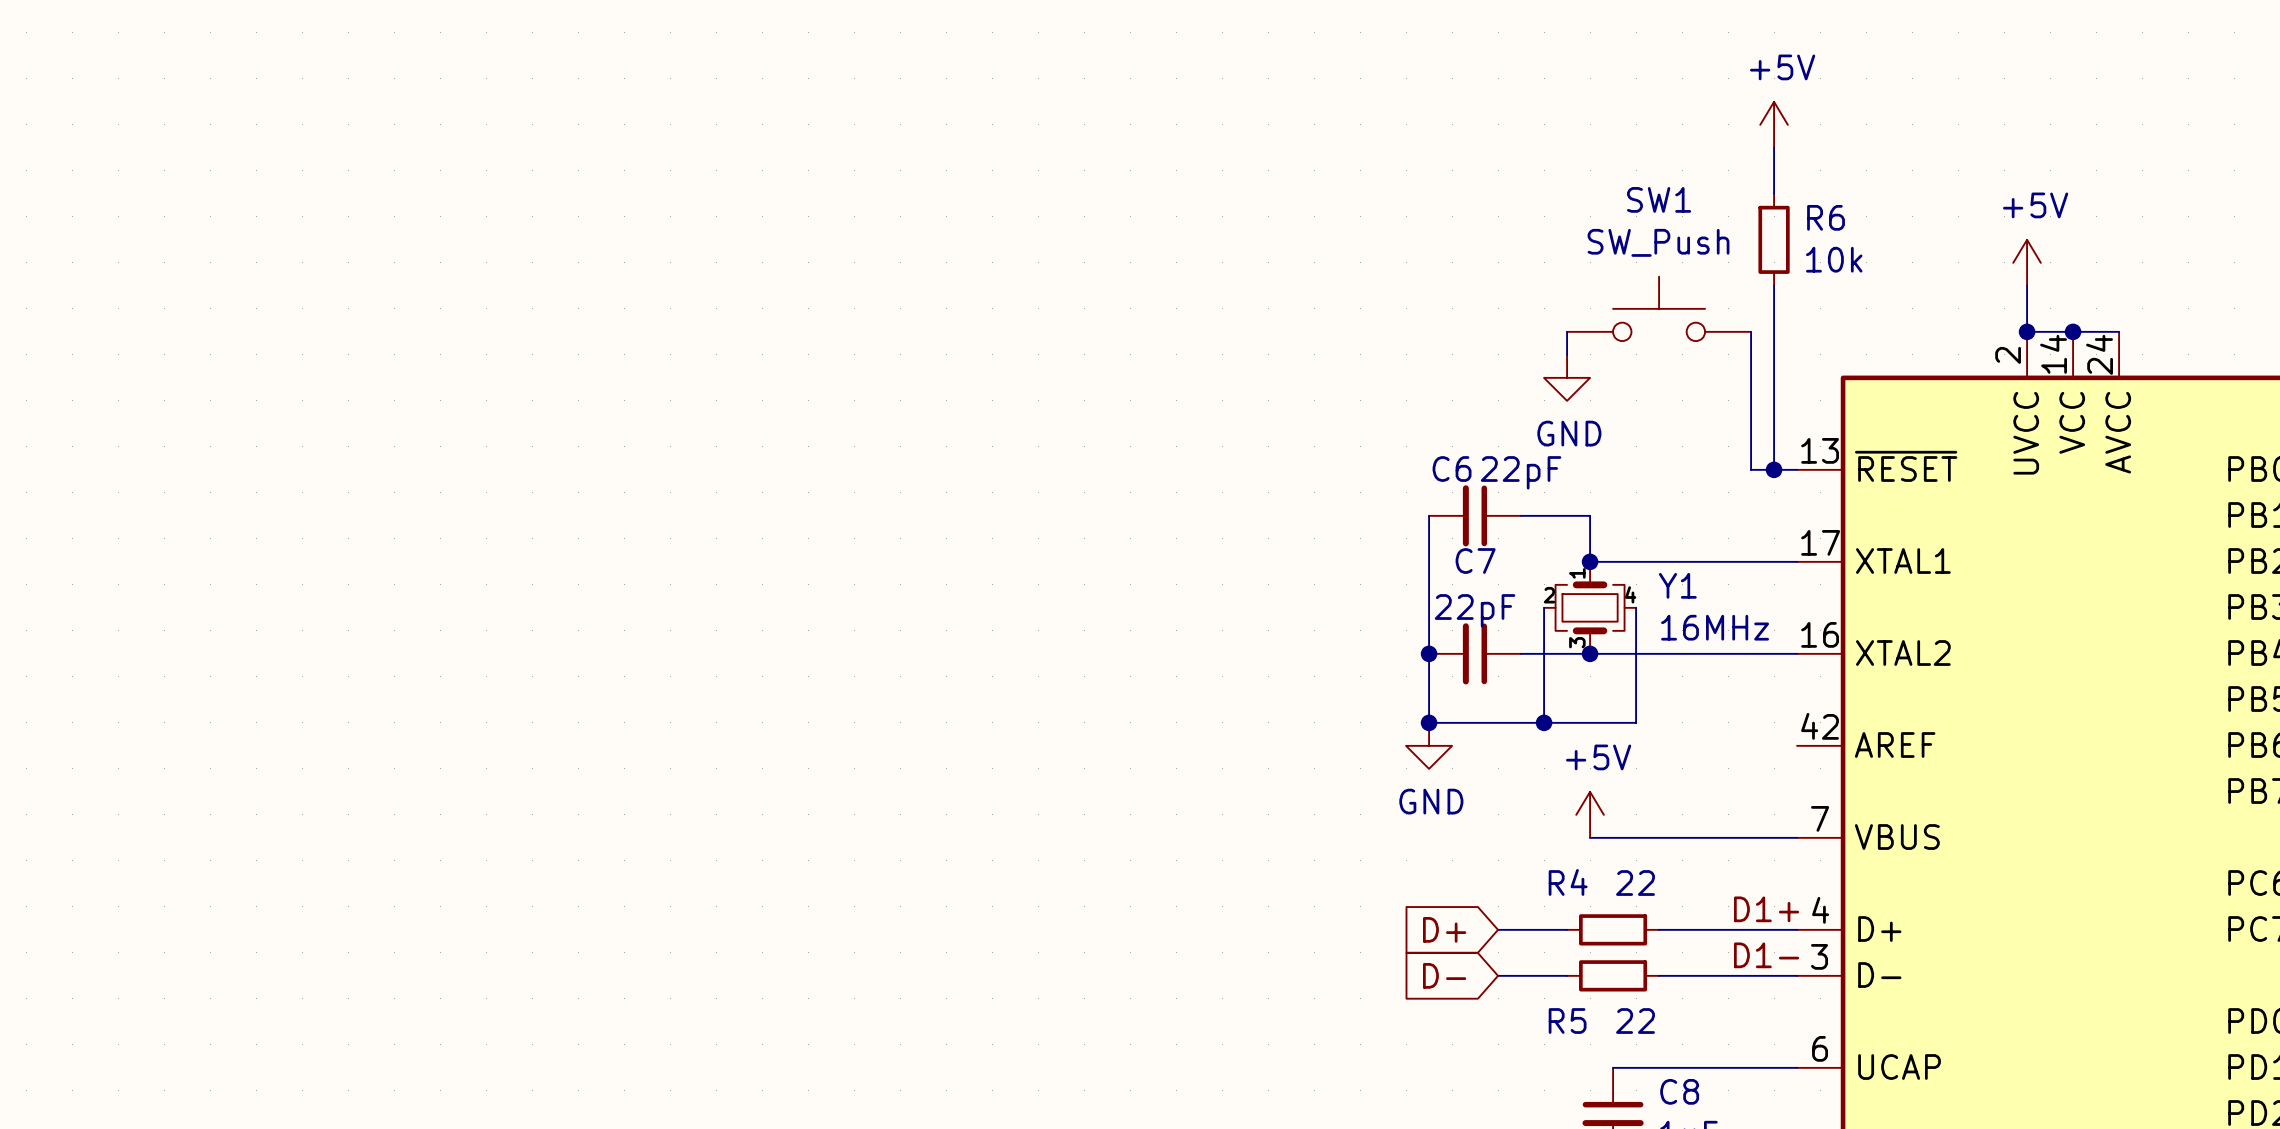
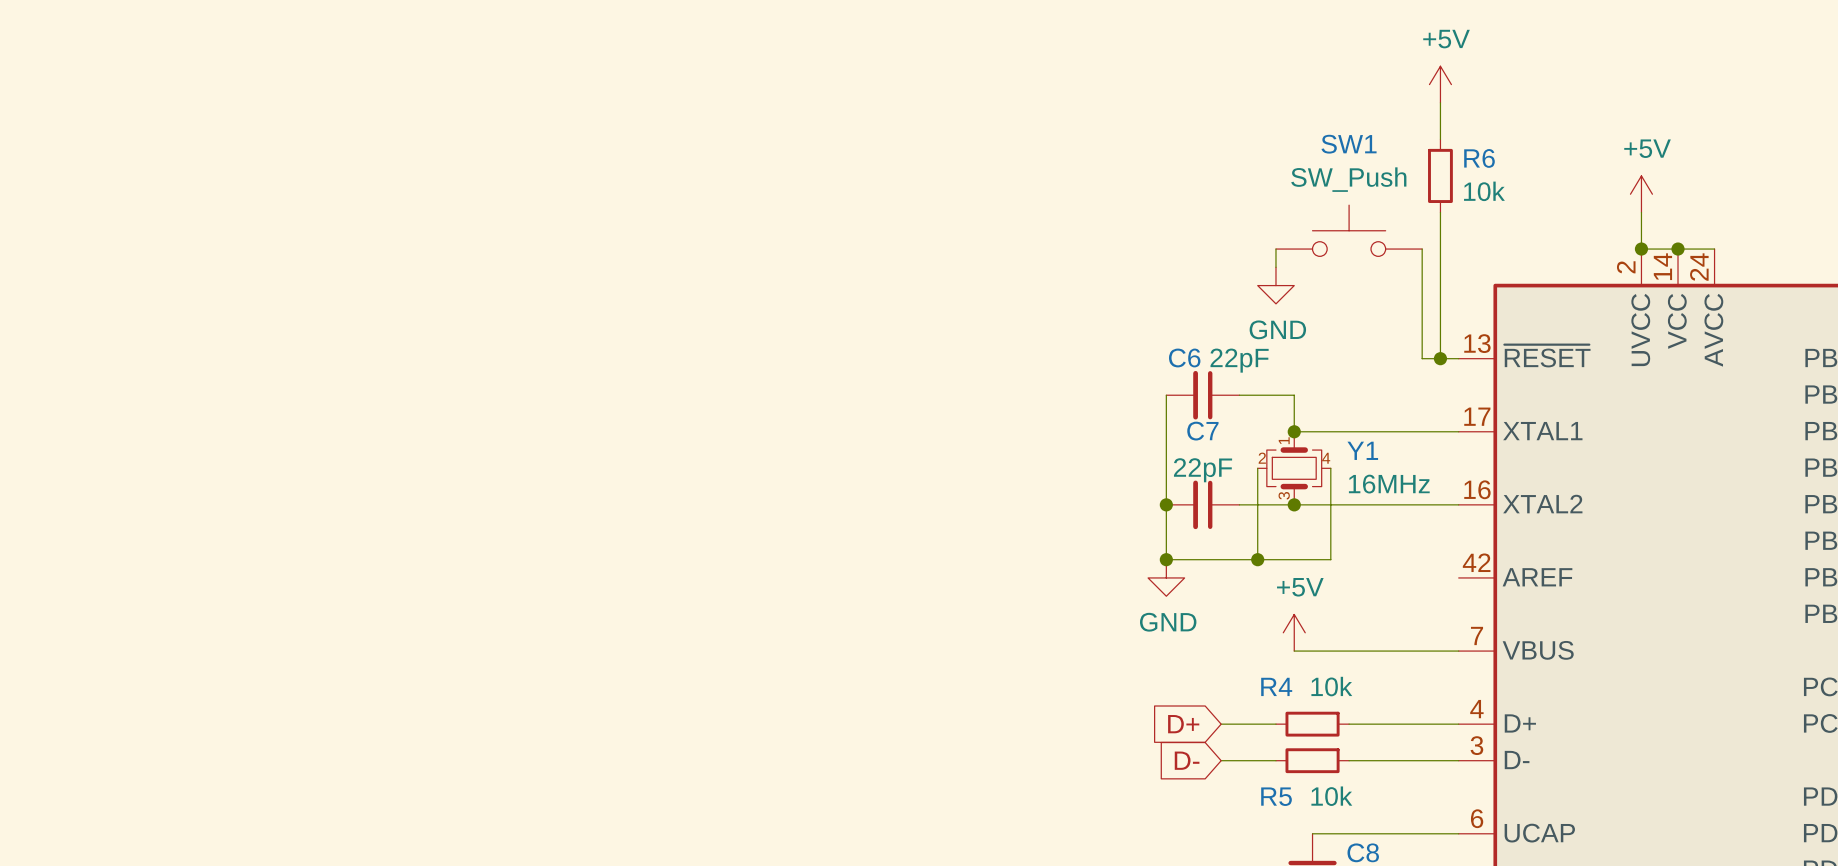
R4 value: 22 (1635, 883) -> 10k (1331, 686)
label: D1+ (1766, 909) -> none
label: D1- (1766, 955) -> none
R5 value: 22 (1635, 1021) -> 10k (1331, 796)

